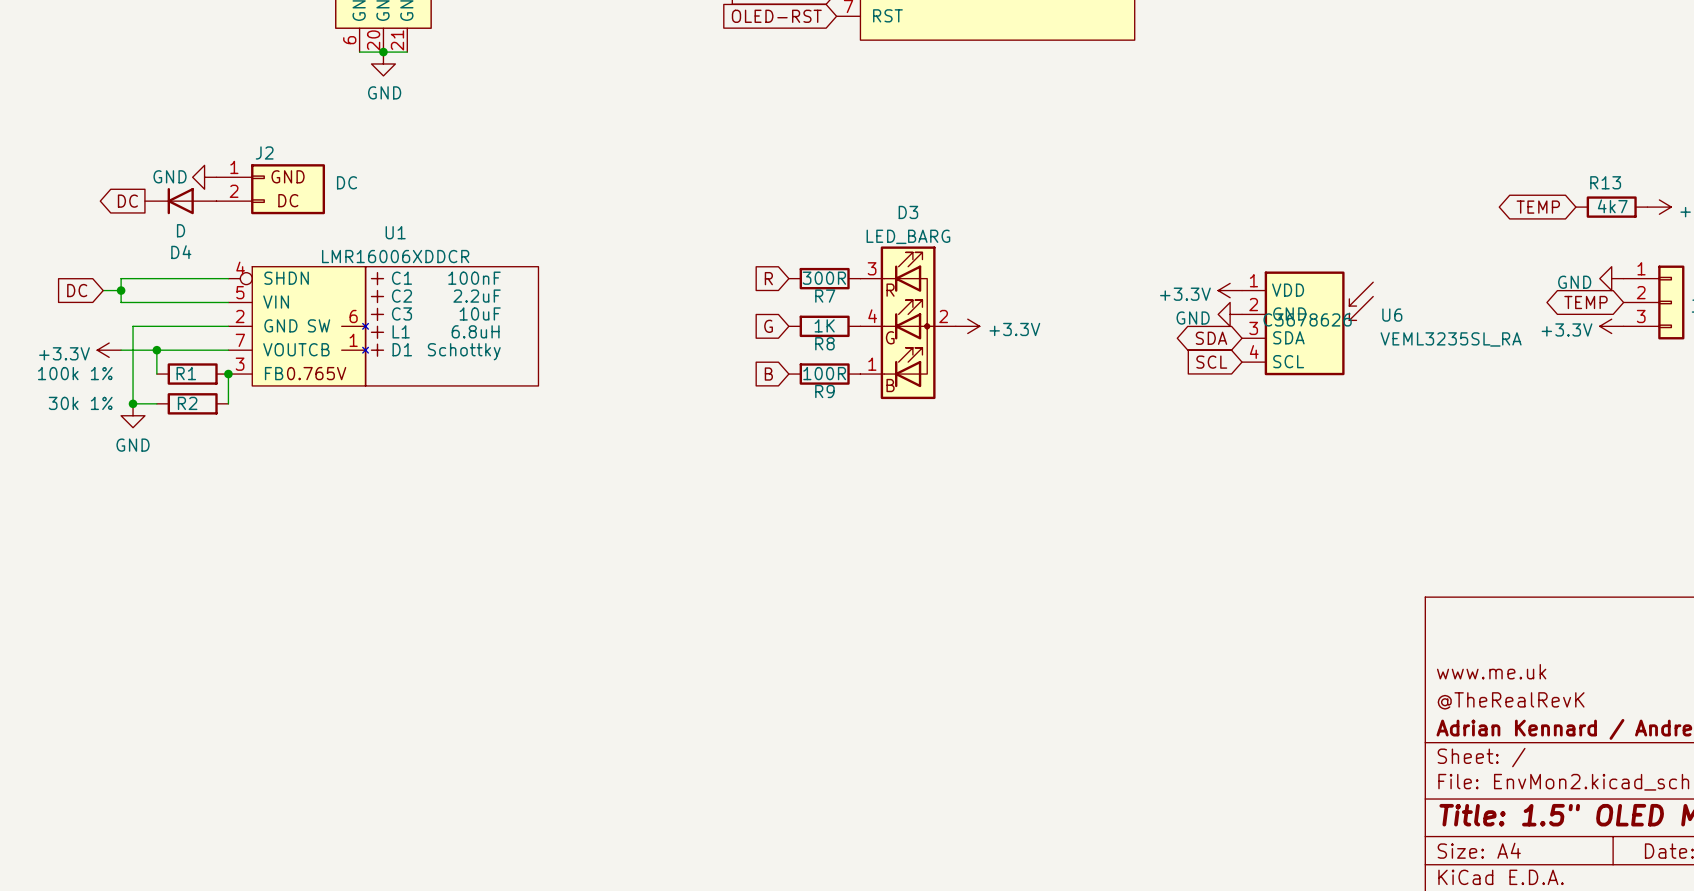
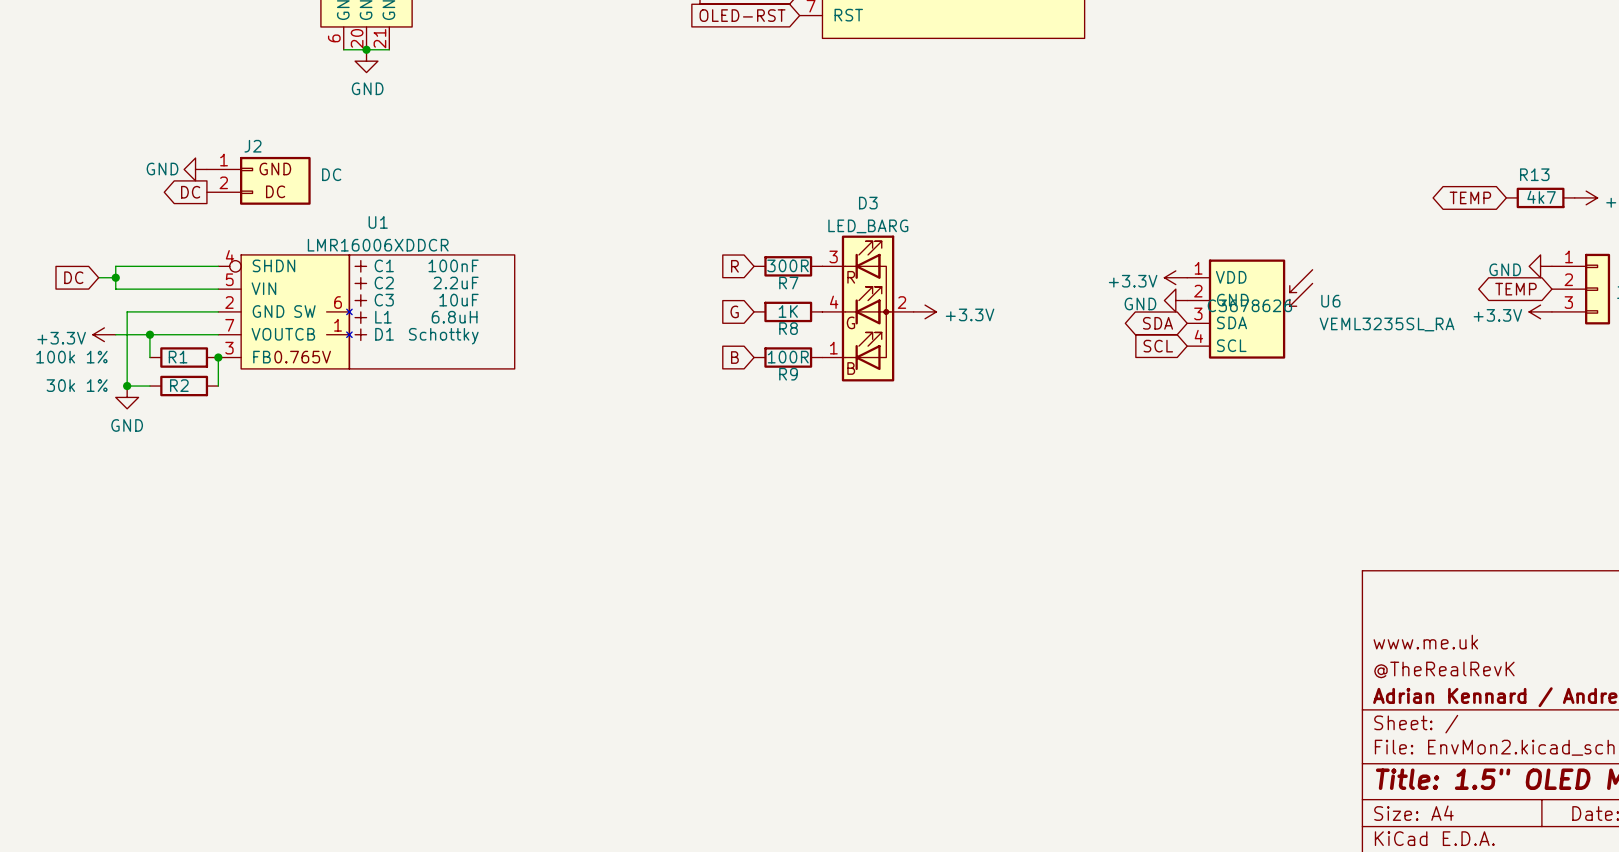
global label position: DC (127, 201) -> DC (190, 192)
D4: D (180, 201) -> none

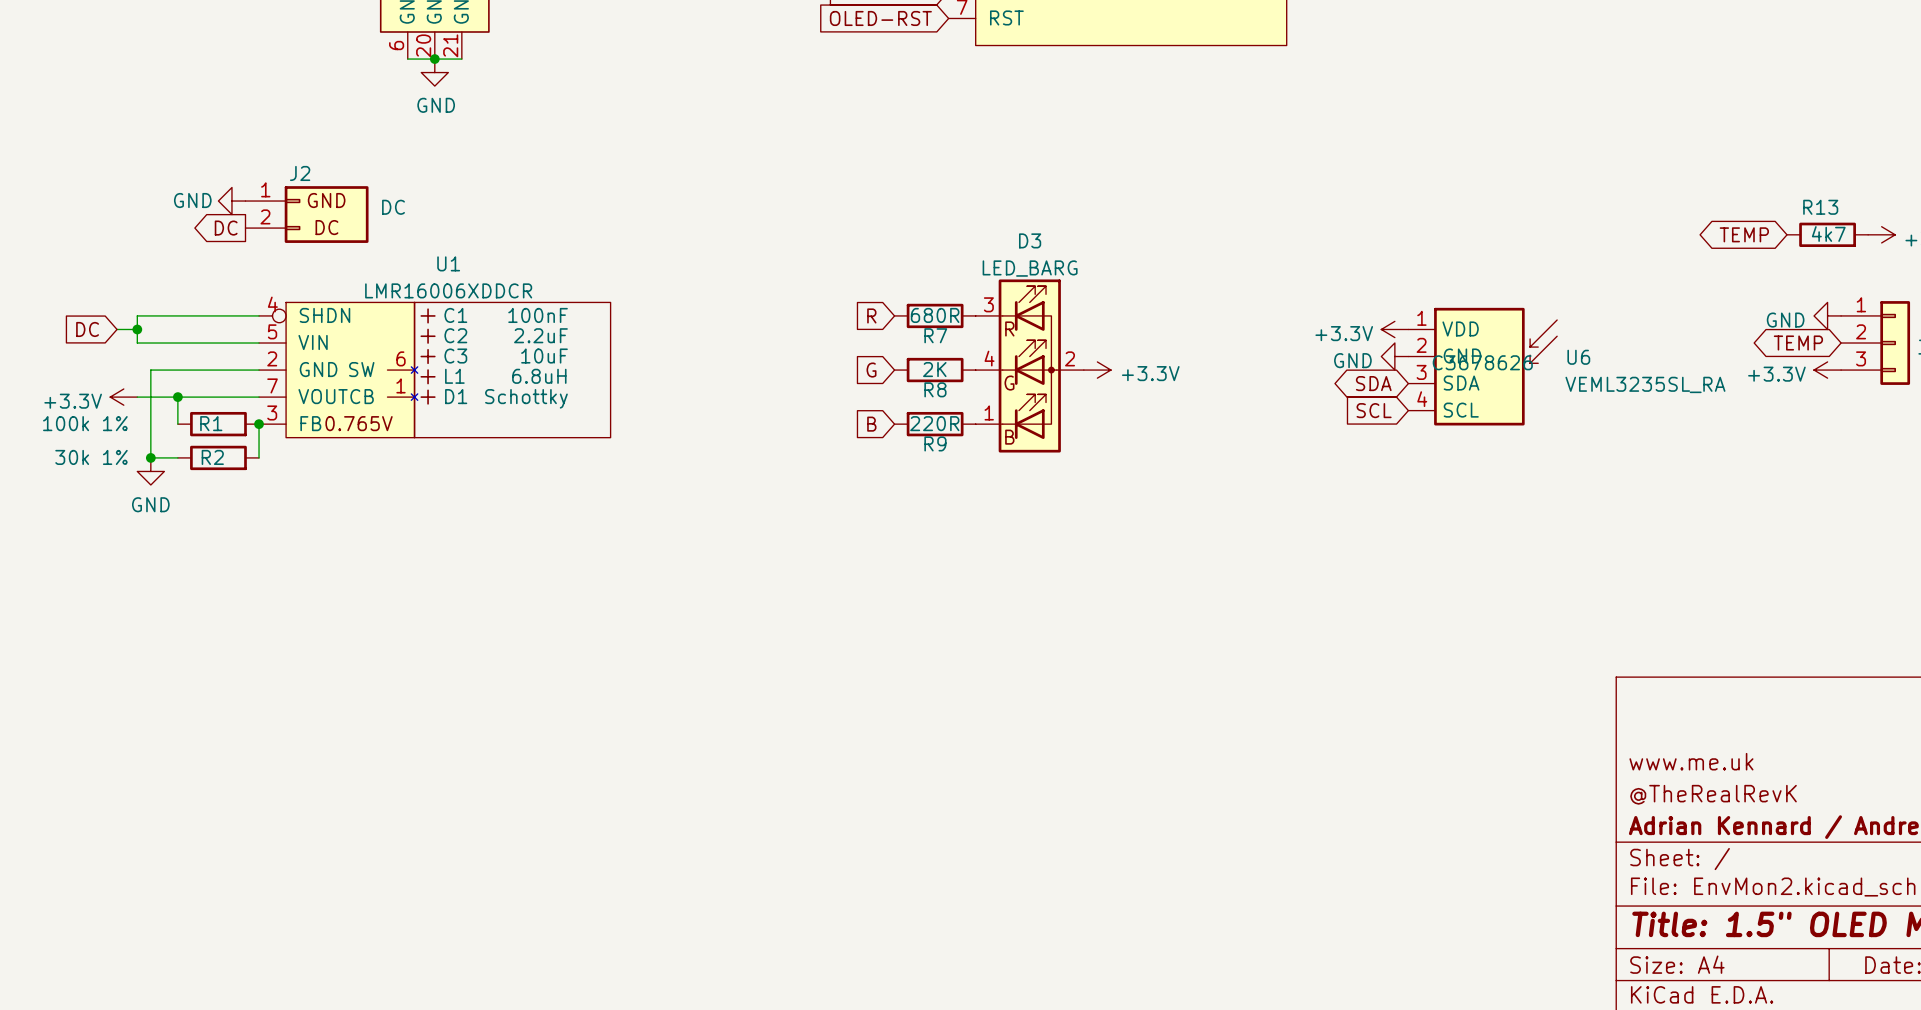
R7 value: 300R (787, 265) -> 680R (935, 315)
R8 value: 1K (788, 311) -> 2K (934, 369)
R9 value: 100R (788, 357) -> 220R (934, 423)

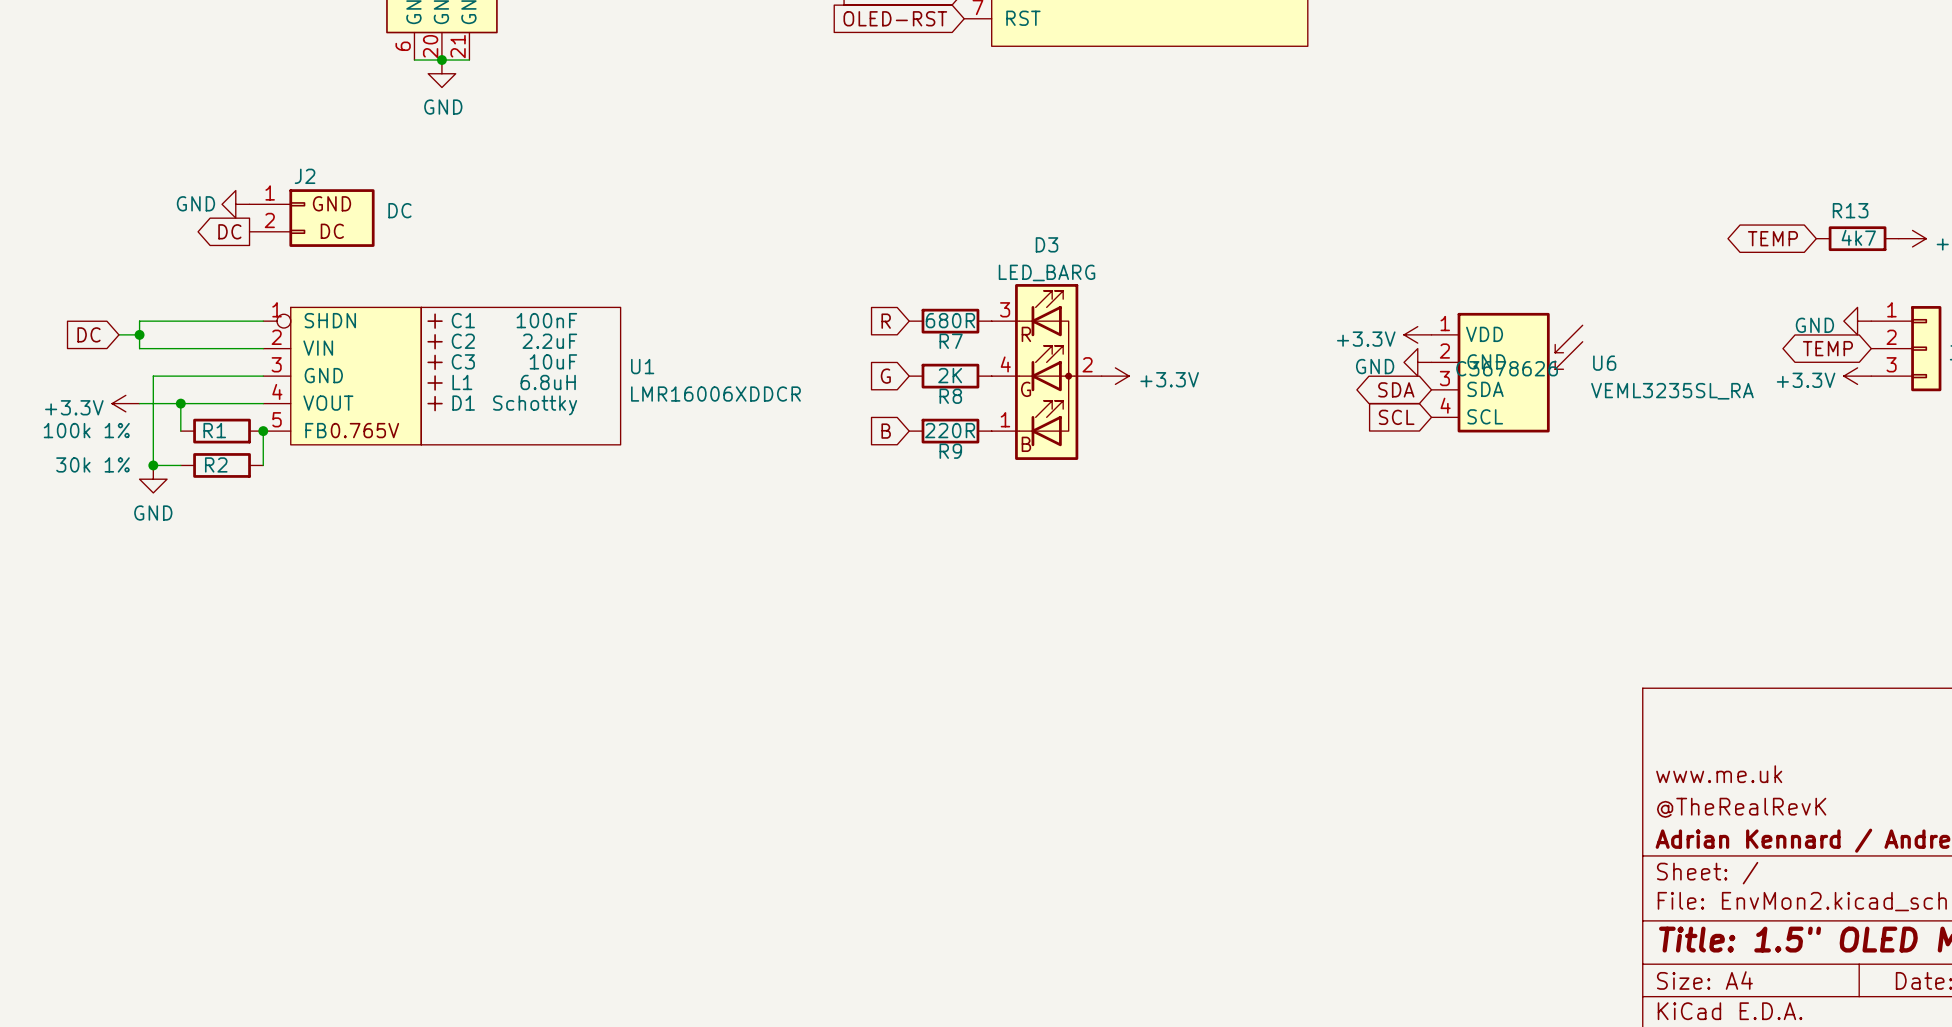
U1 name position: U1 (448, 263) -> U1 (642, 366)
U1 value position: LMR16006XDDCR (448, 290) -> LMR16006XDDCR (715, 394)
U1 symbol: [259, 302, 611, 438] -> [263, 307, 621, 445]

